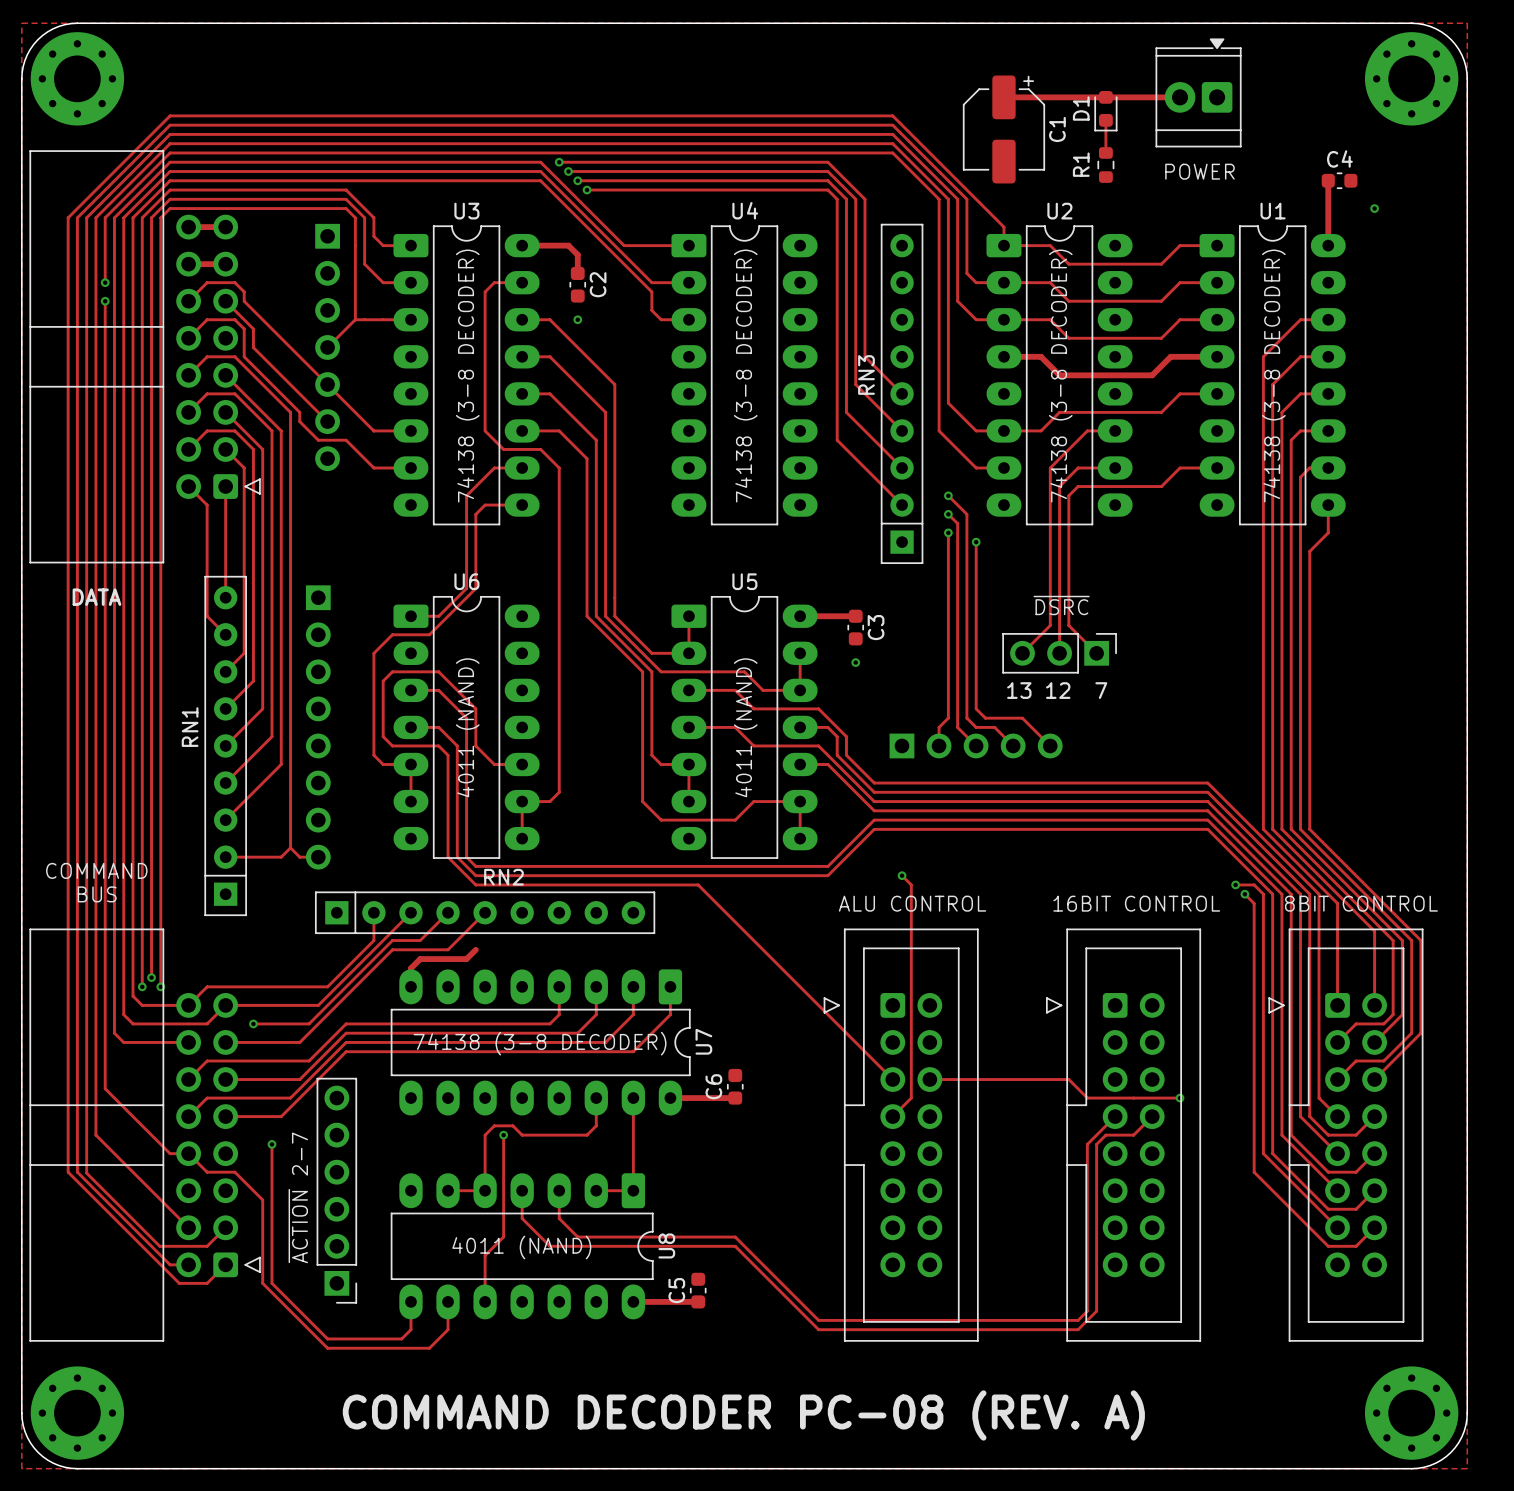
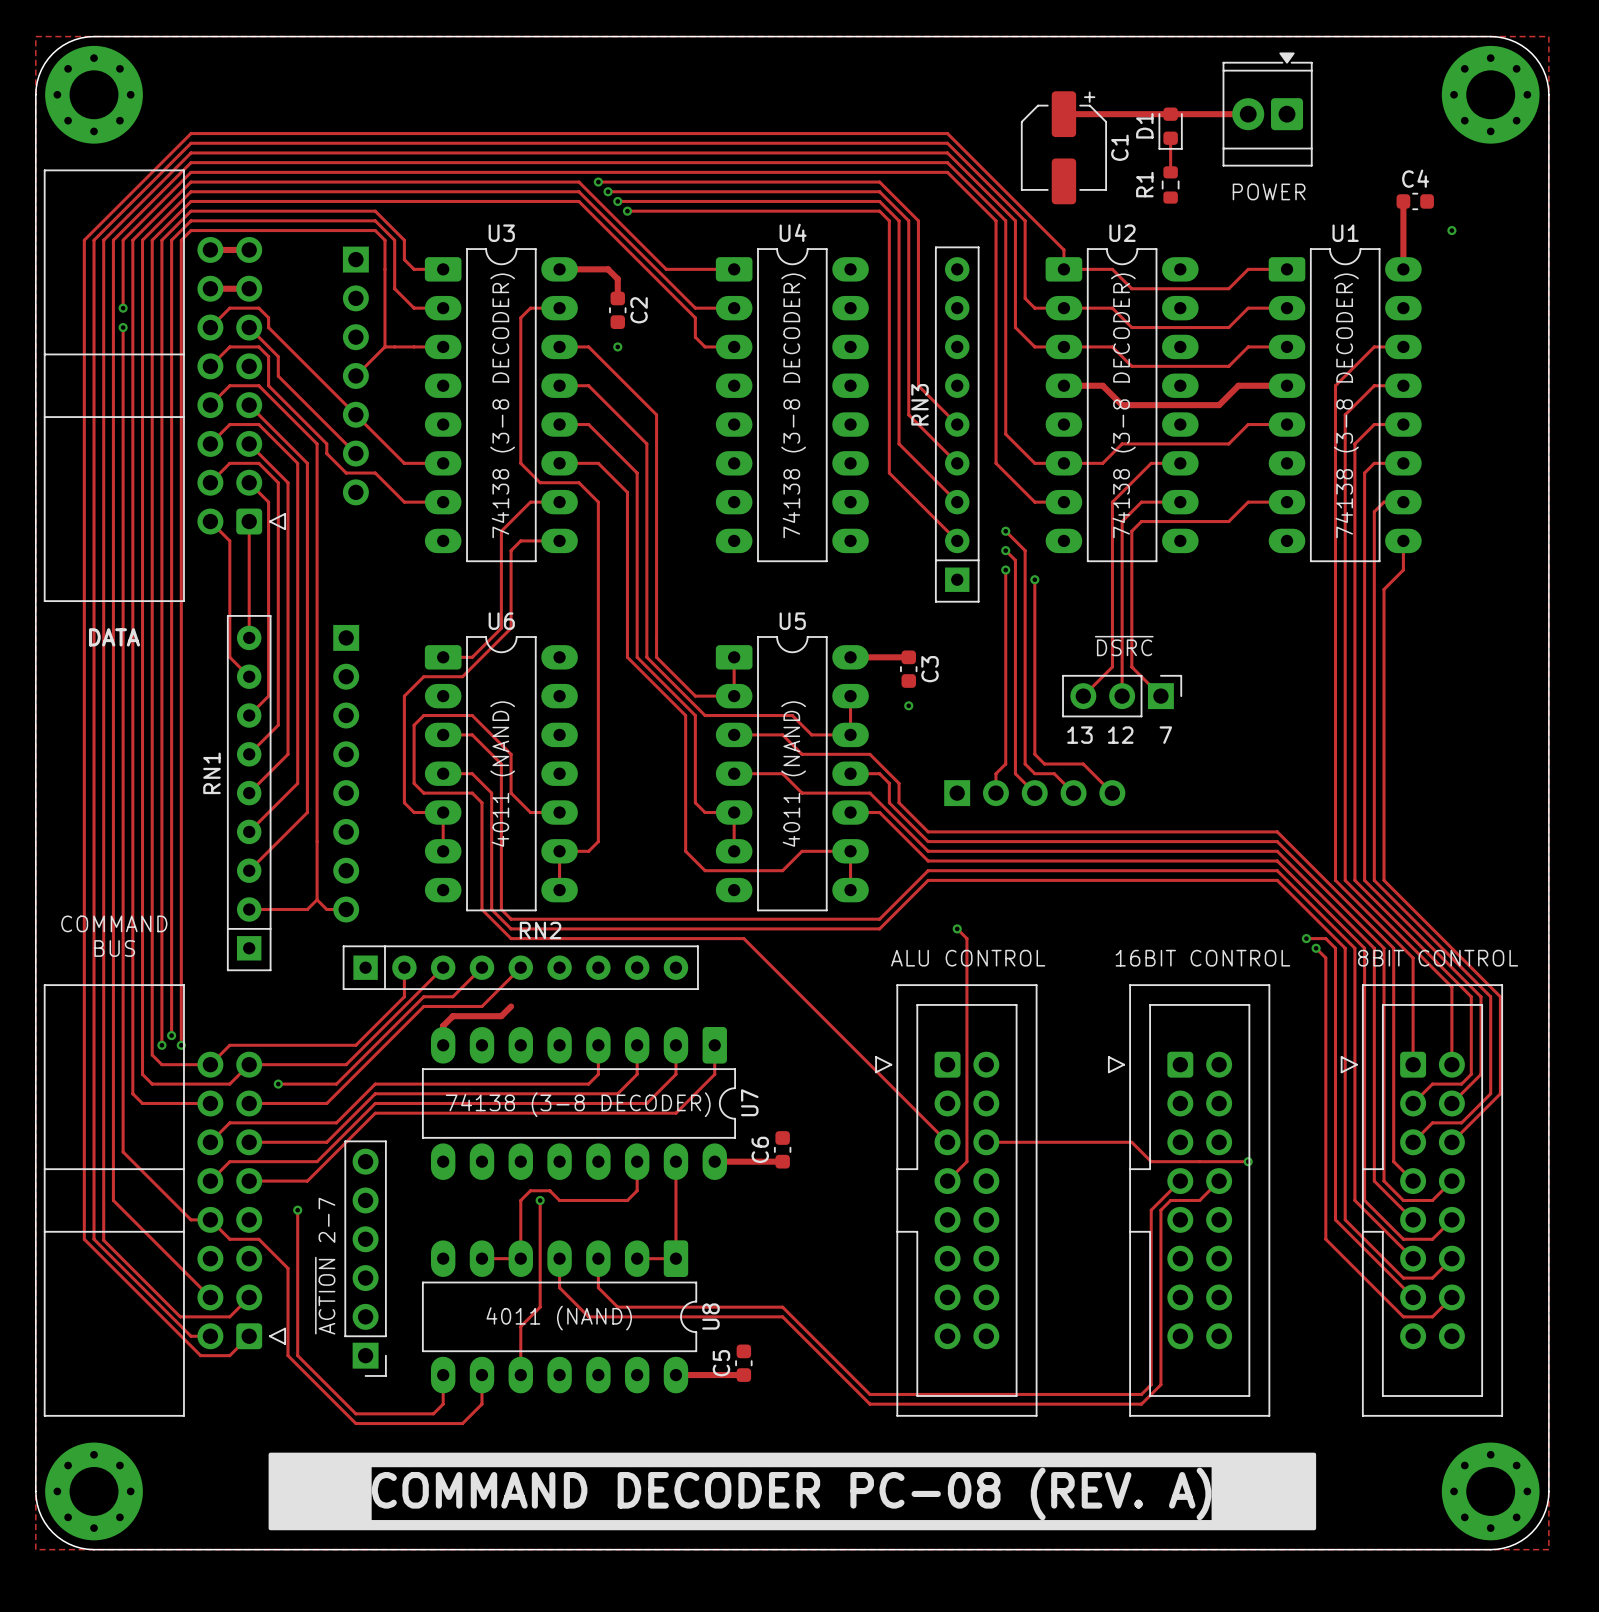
drawing: none -> [268, 1452, 1317, 1531]

